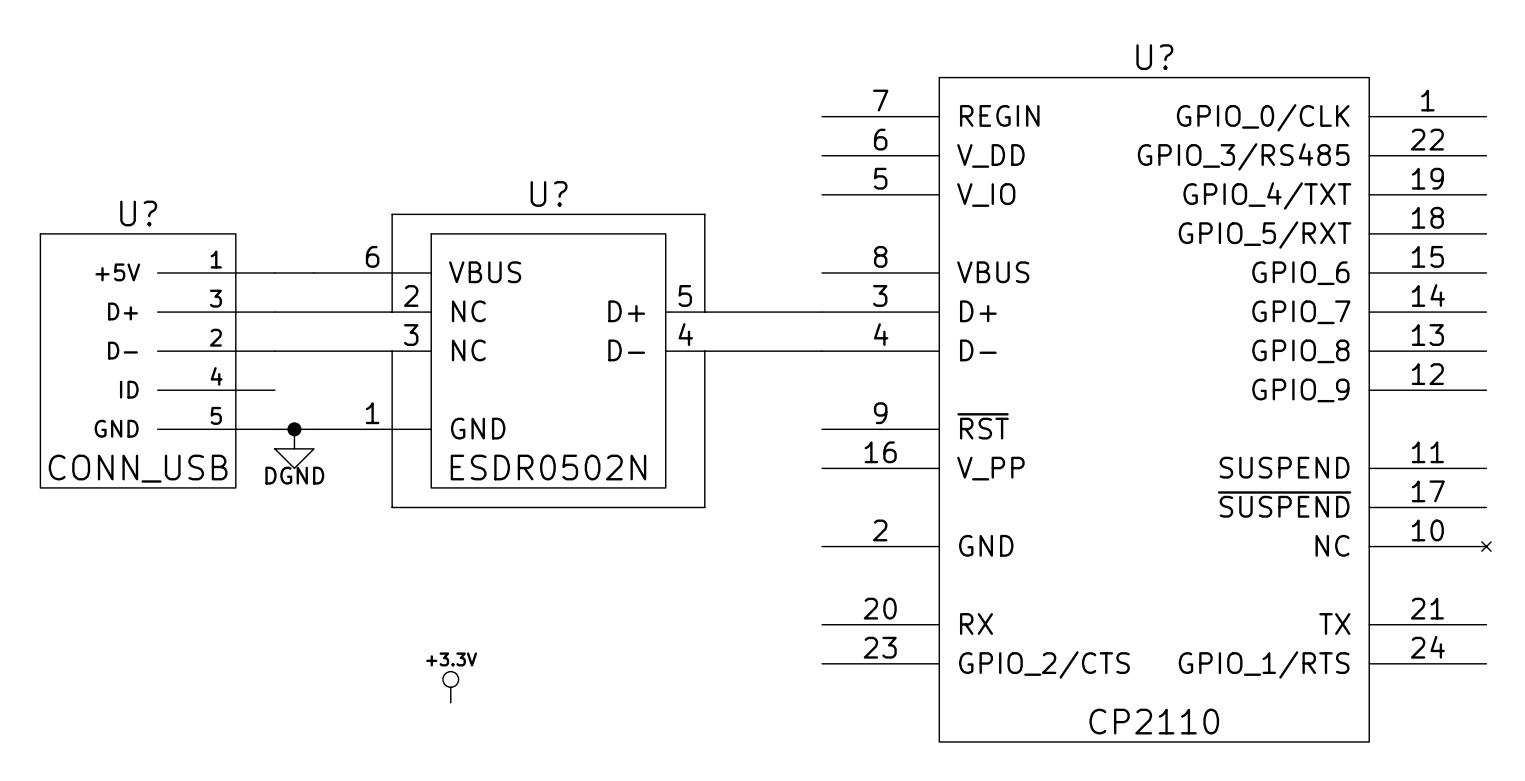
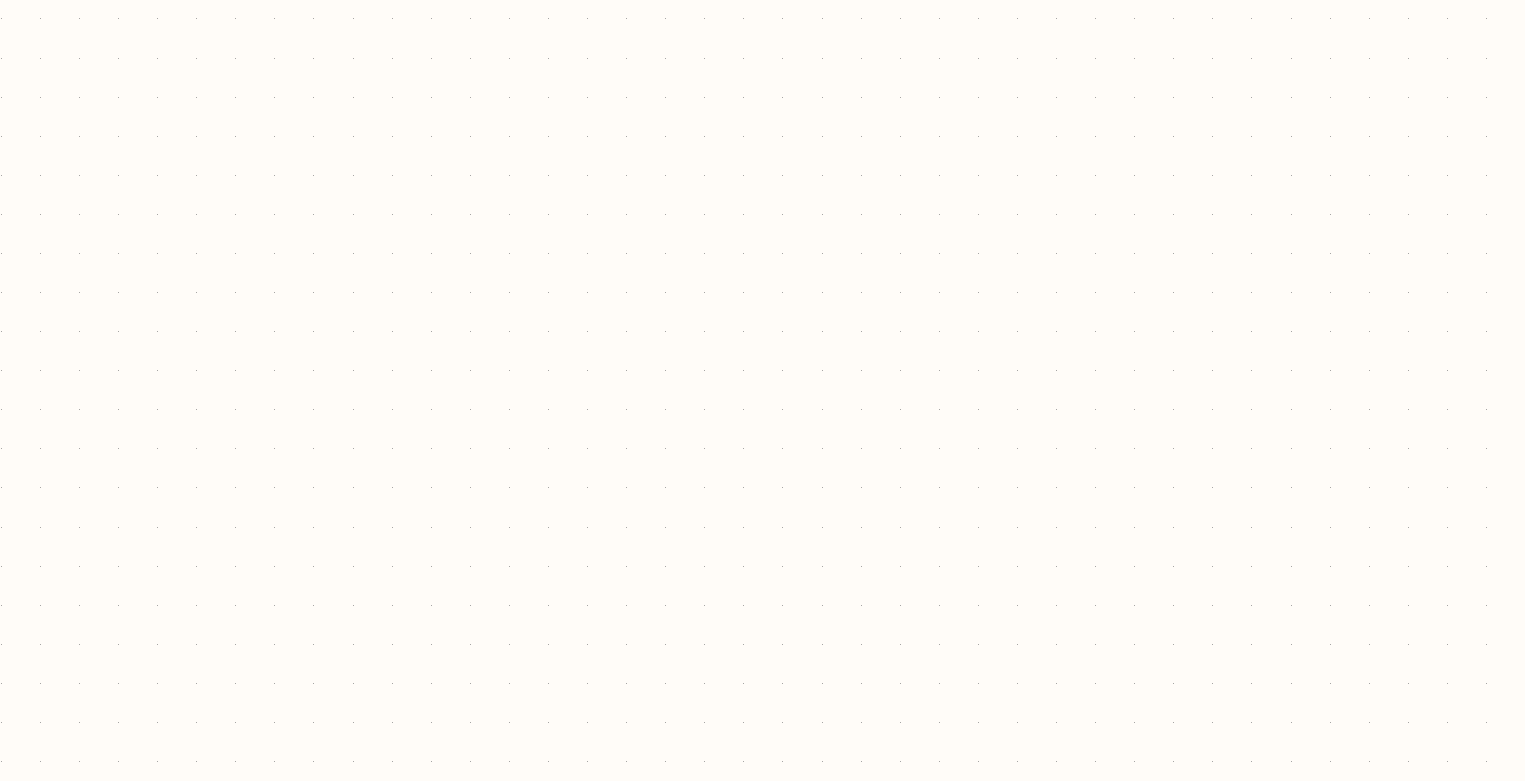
wire: (274, 272) (313, 272) -> none
wire: (274, 312) (392, 312) (392, 214) (704, 214) (704, 312) (822, 312) -> none
wire: (274, 351) (392, 351) (392, 507) (704, 507) (704, 351) (822, 351) -> none
U?: CONN_USB (157, 360) -> none
U?: ESDR0502N (509, 360) -> none
U?: CP2110 (1156, 409) -> none
wire: (274, 429) (313, 429) -> none
wire: (294, 429) (294, 448) -> none
junction: (294, 429) -> none
power symbol: DGND (294, 458) -> none
power symbol: +3.3V (450, 687) -> none

